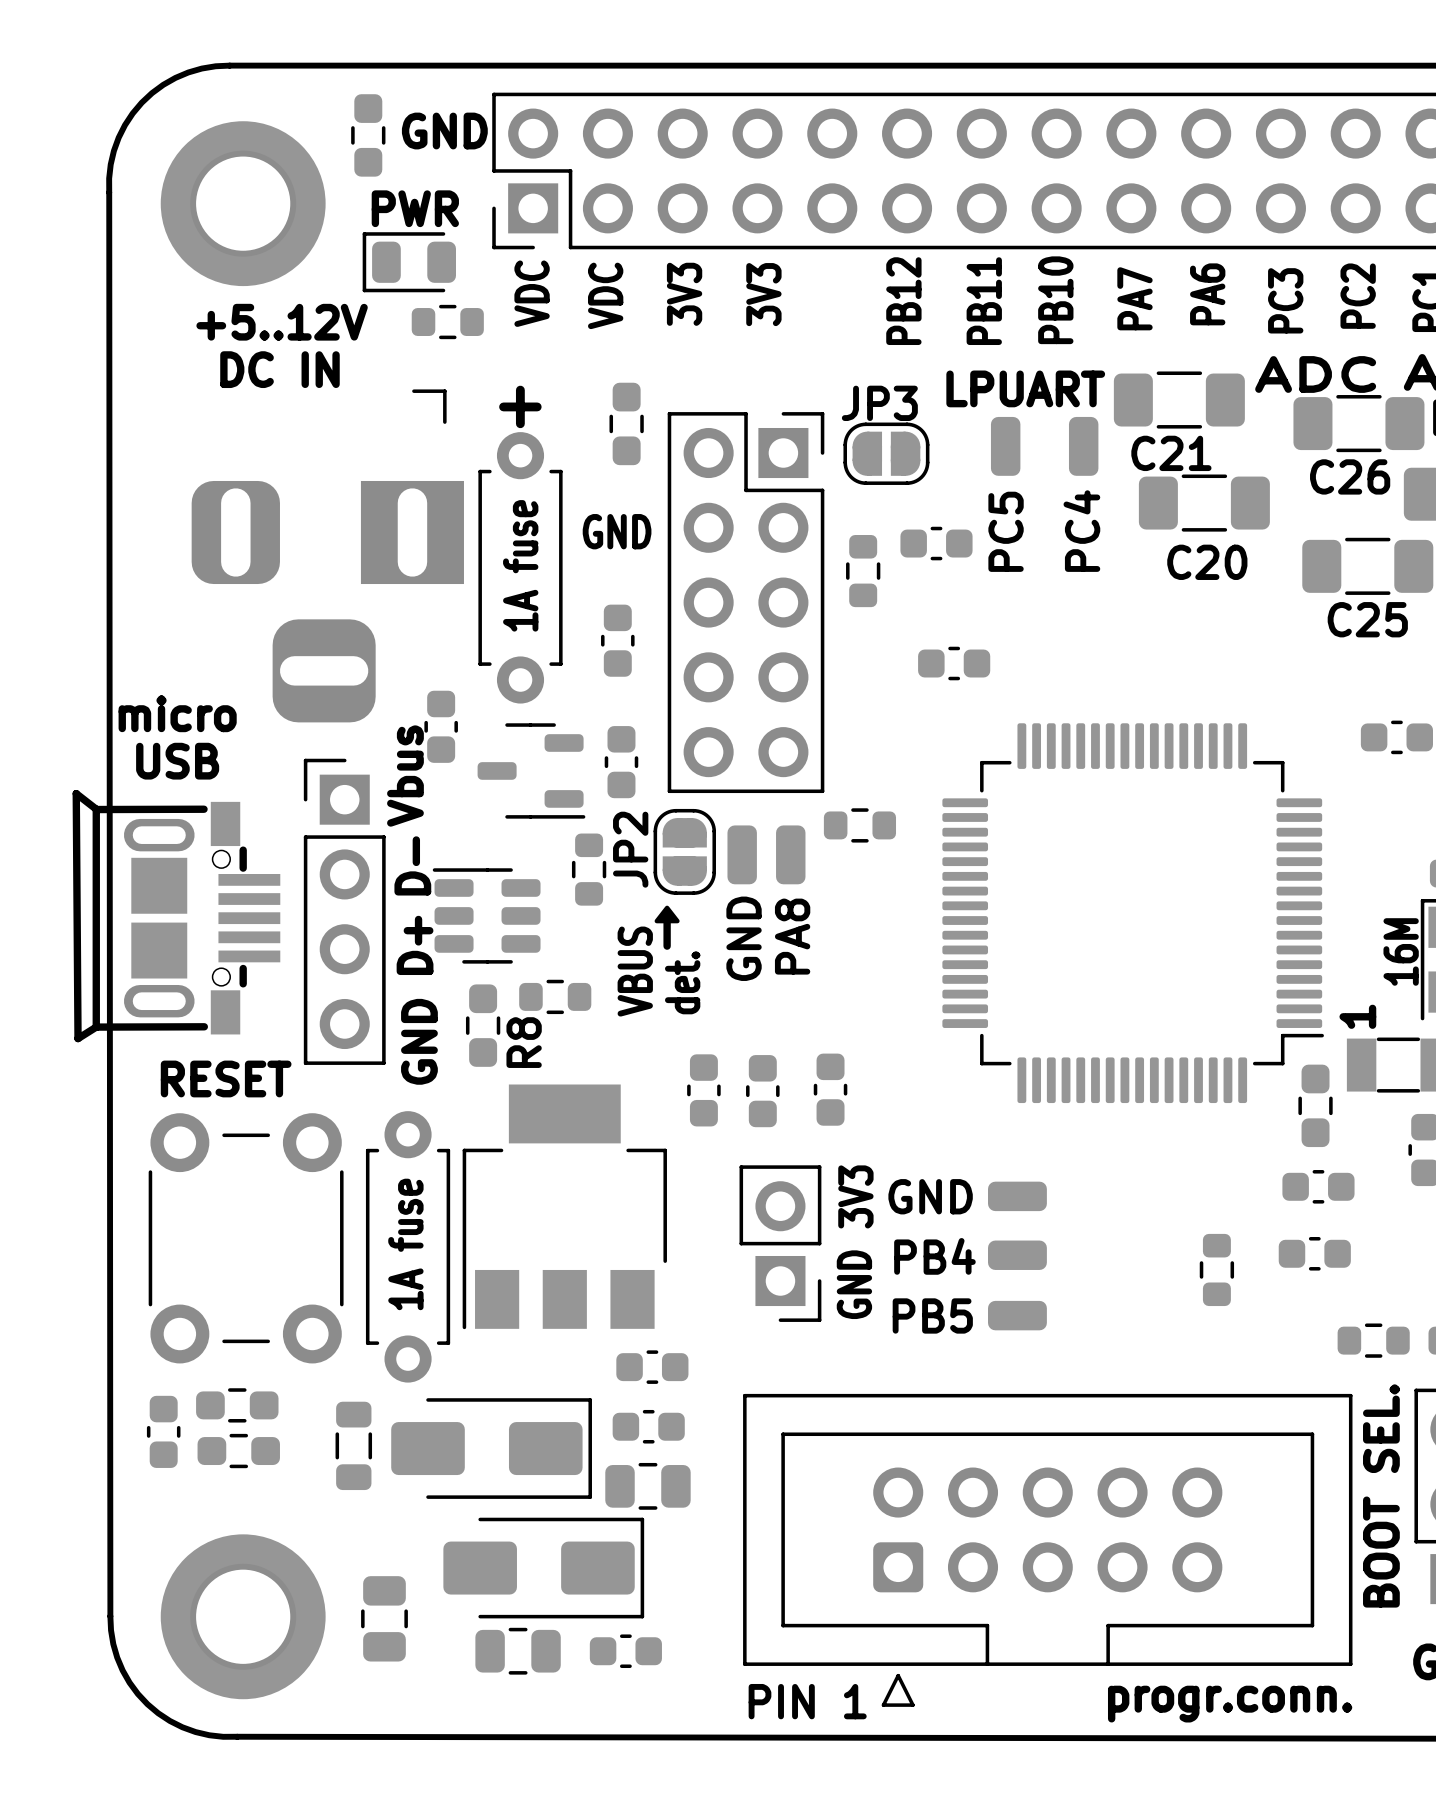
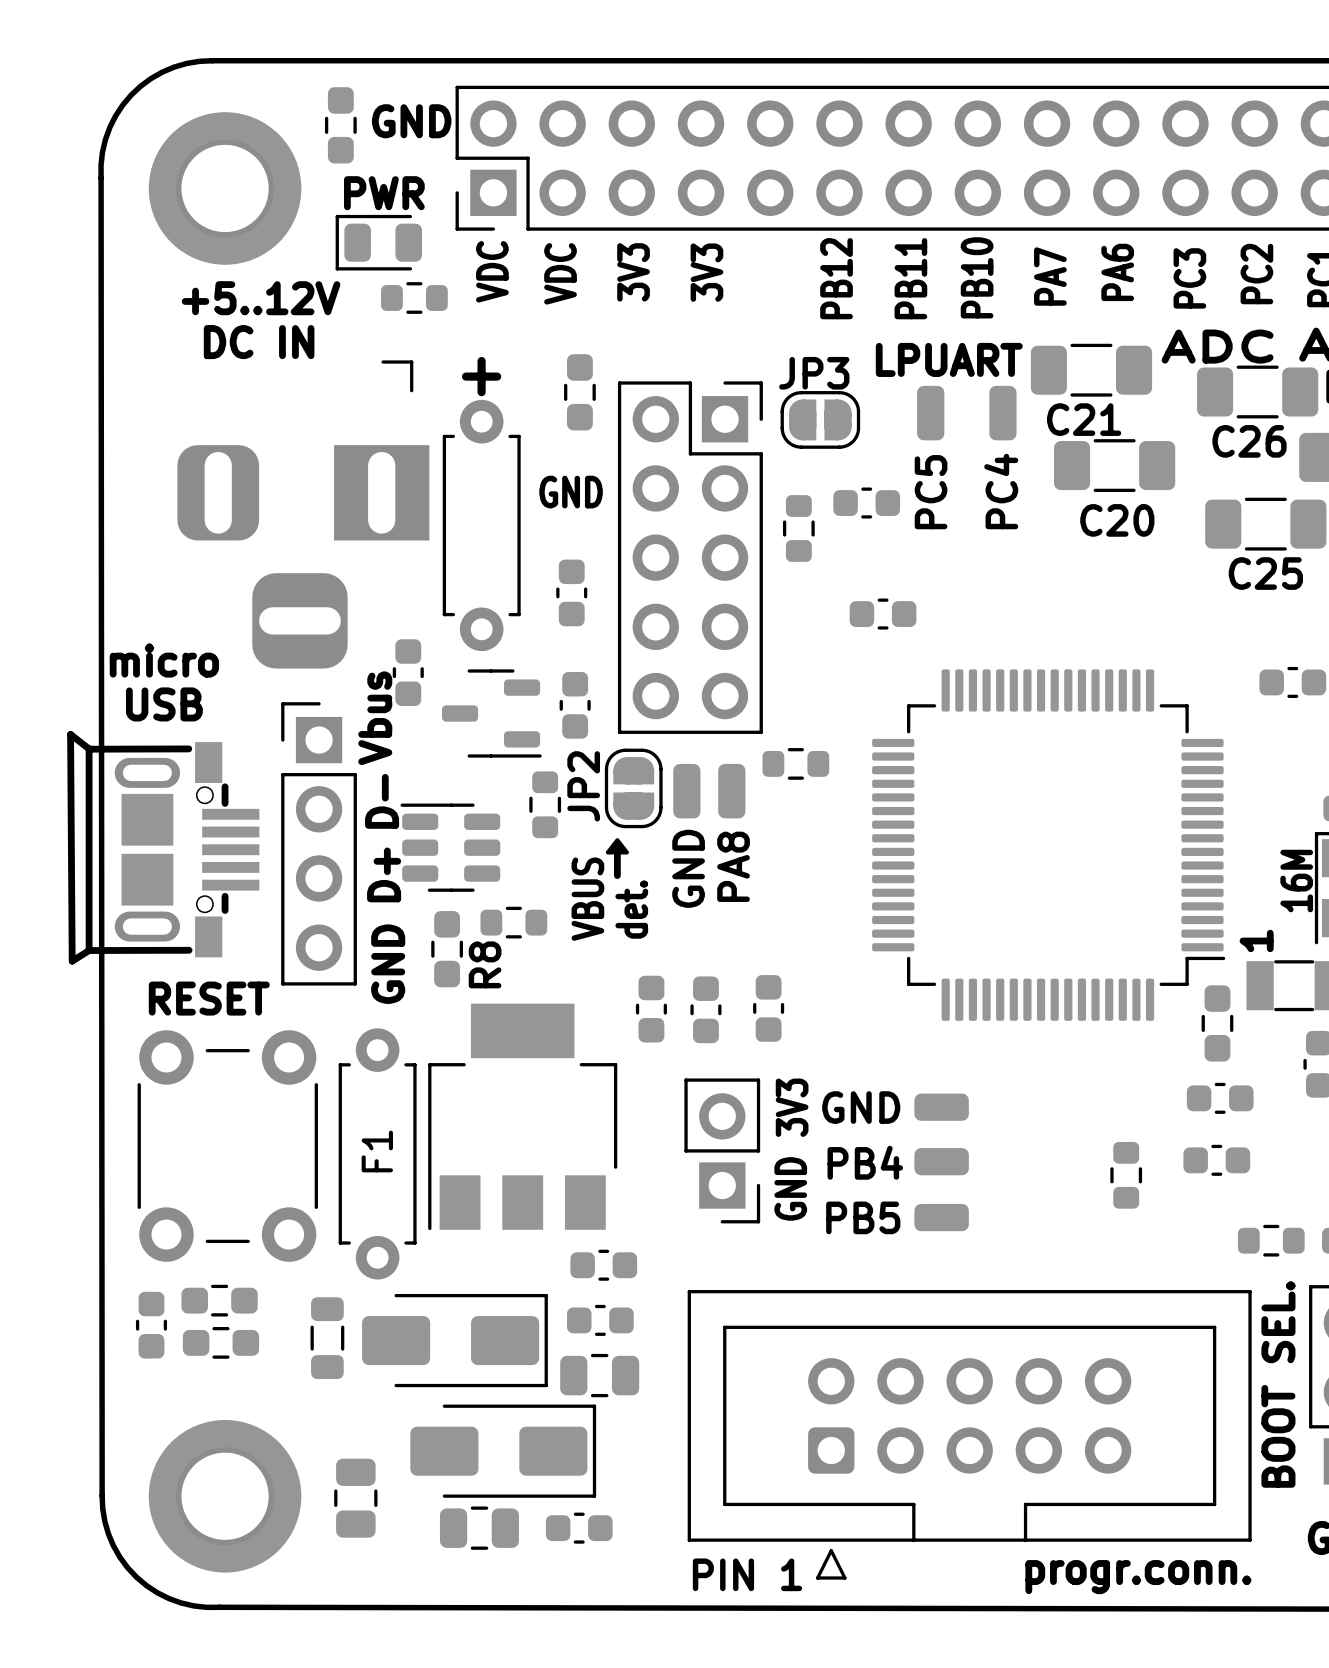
text: 1A fuse (520, 565) -> none
text: 1A fuse (405, 1244) -> none
F1 name: none -> F1 (377, 1151)

